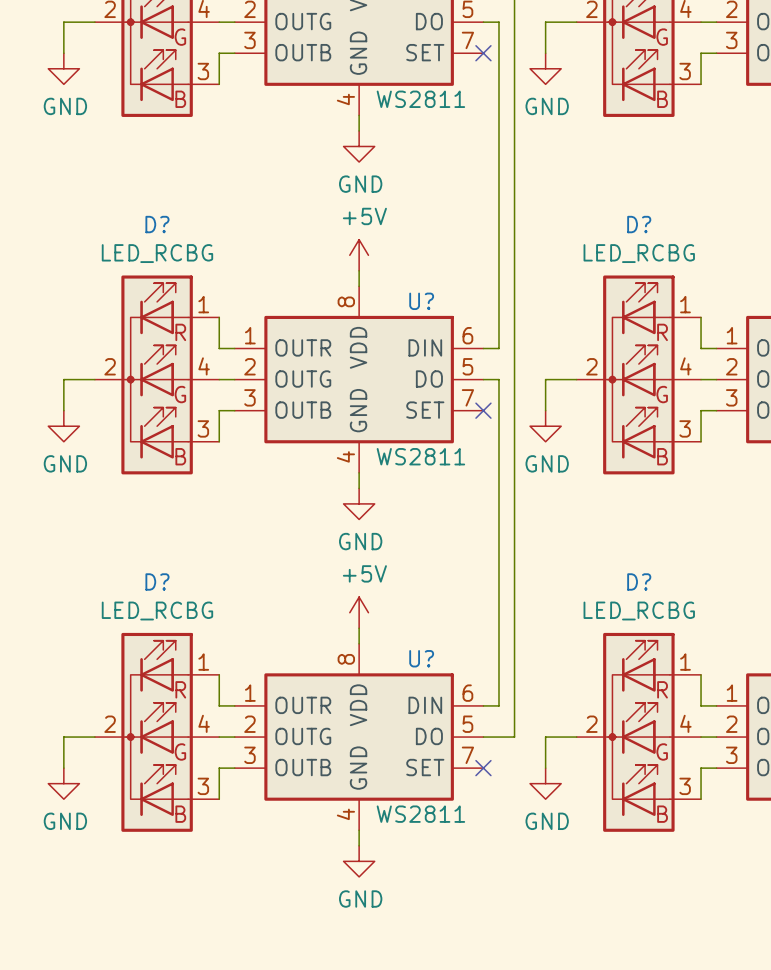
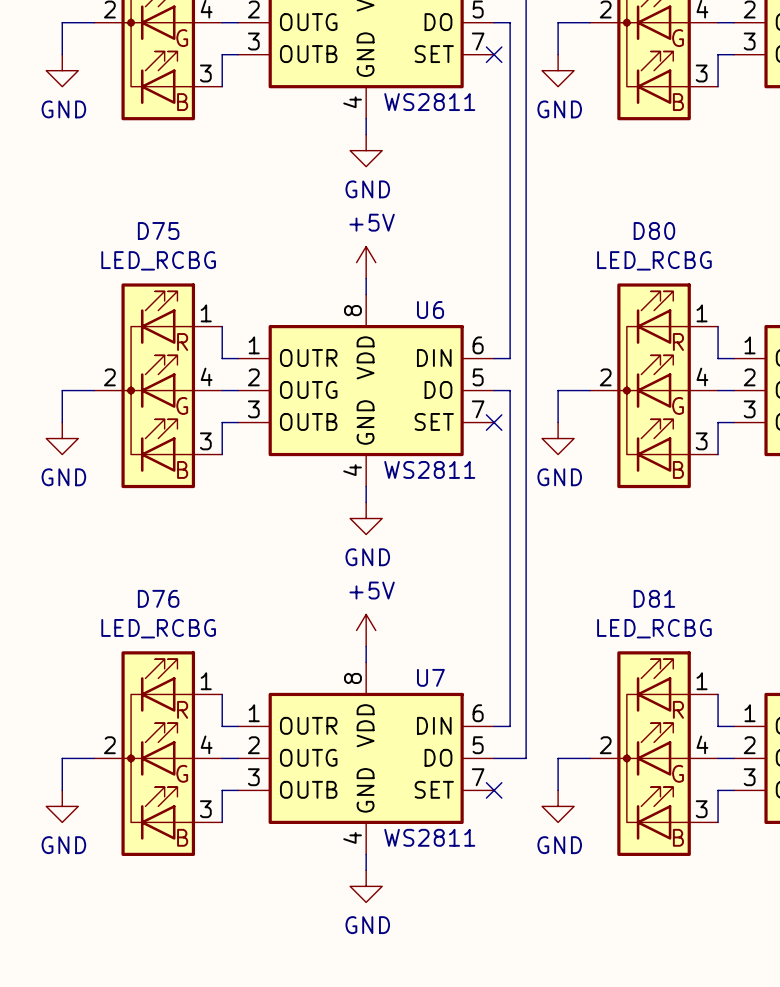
D? name: D? (157, 224) -> D75 (158, 230)
D? name: D? (639, 224) -> D80 (654, 230)
U? name: U? (421, 301) -> U6 (430, 309)
D? name: D? (157, 581) -> D76 (158, 598)
D? name: D? (639, 581) -> D81 (654, 598)
U? name: U? (421, 658) -> U7 (430, 677)

